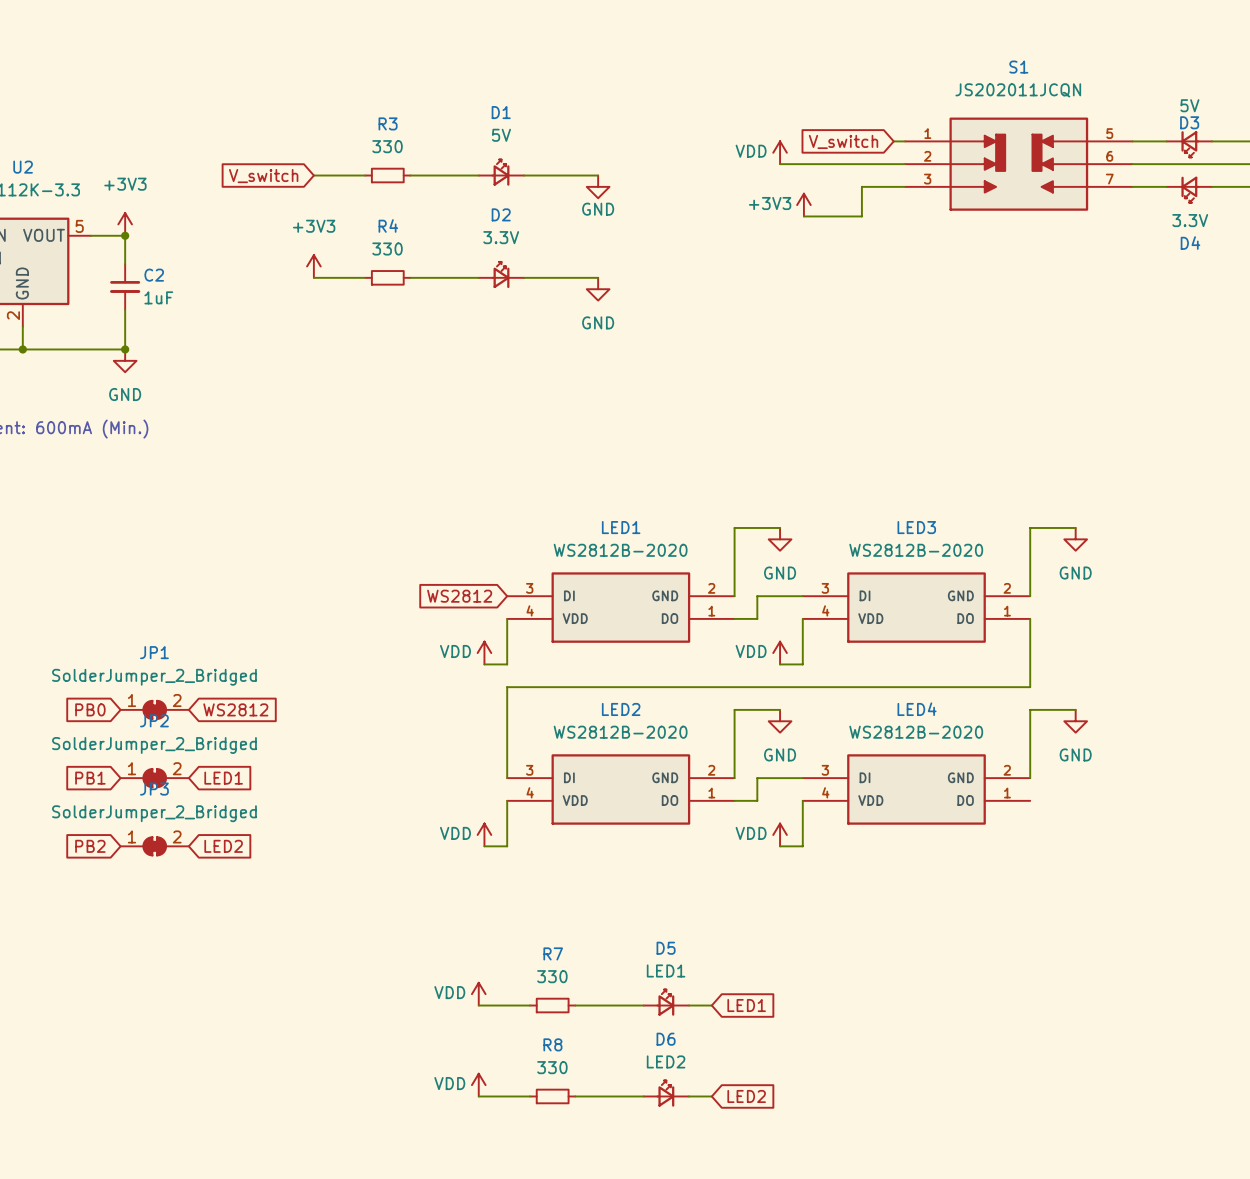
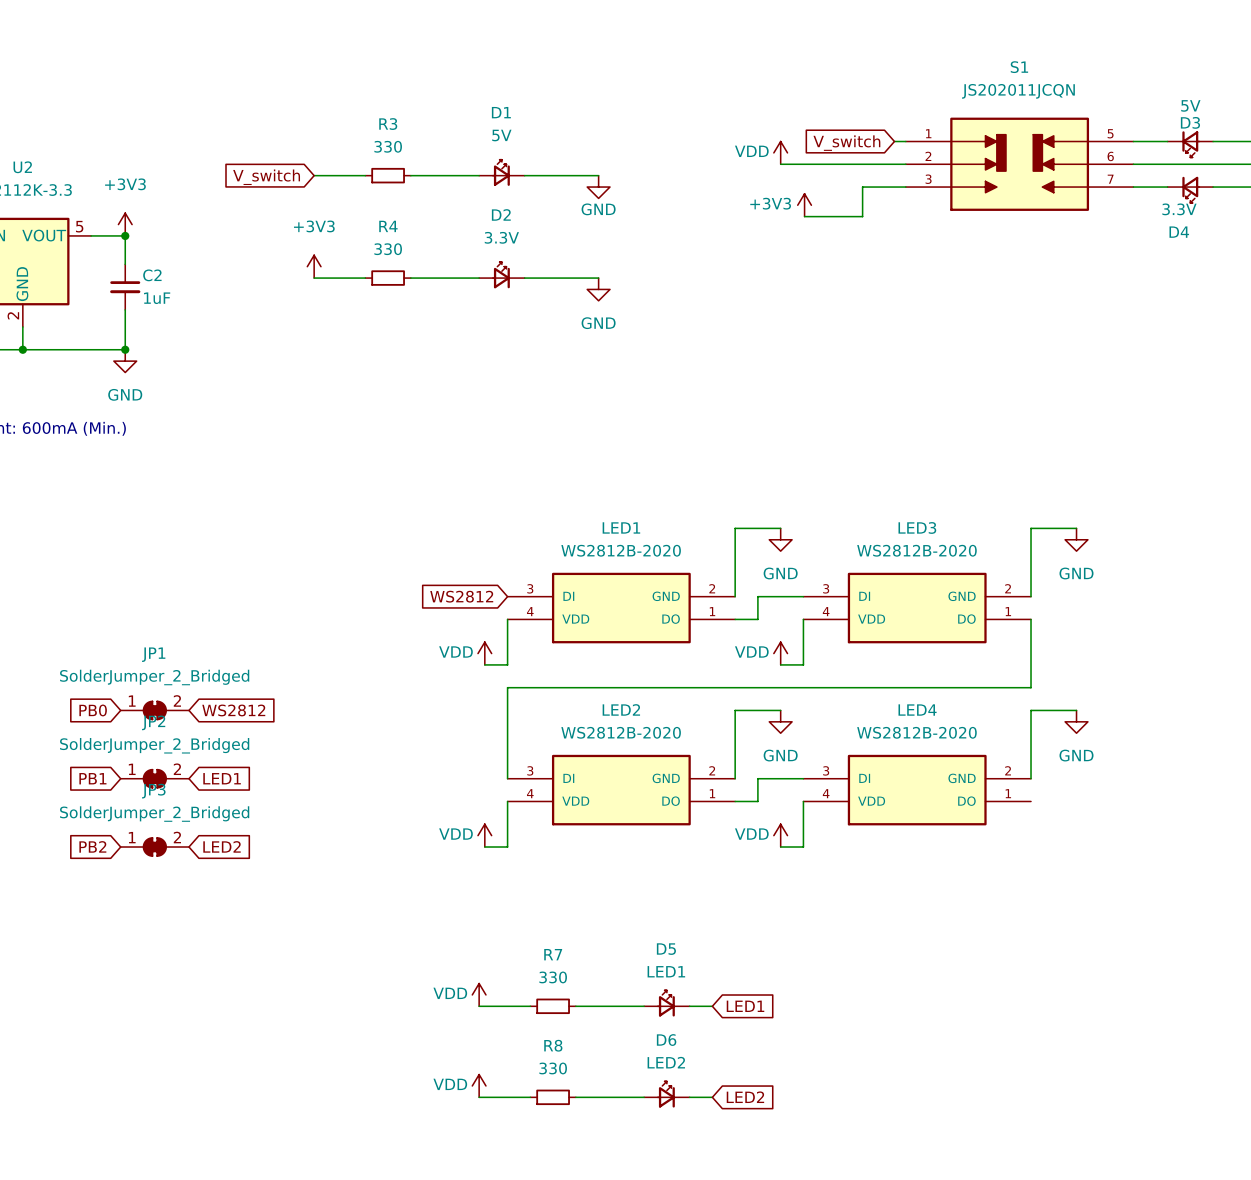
D4 value position: 3.3V (1190, 220) -> 3.3V (1179, 209)
D4 name position: D4 (1190, 243) -> D4 (1179, 232)

